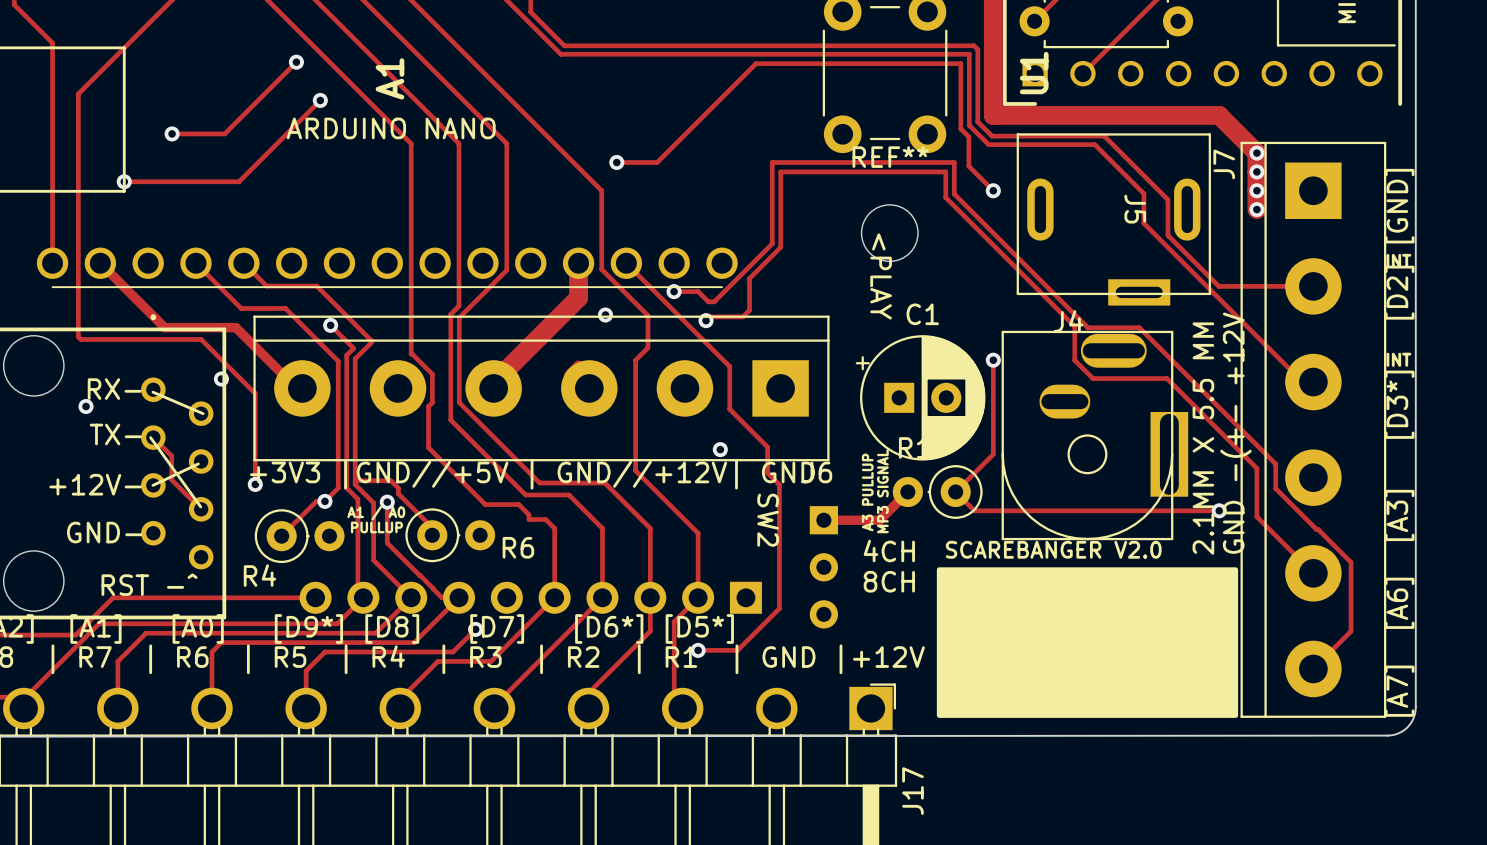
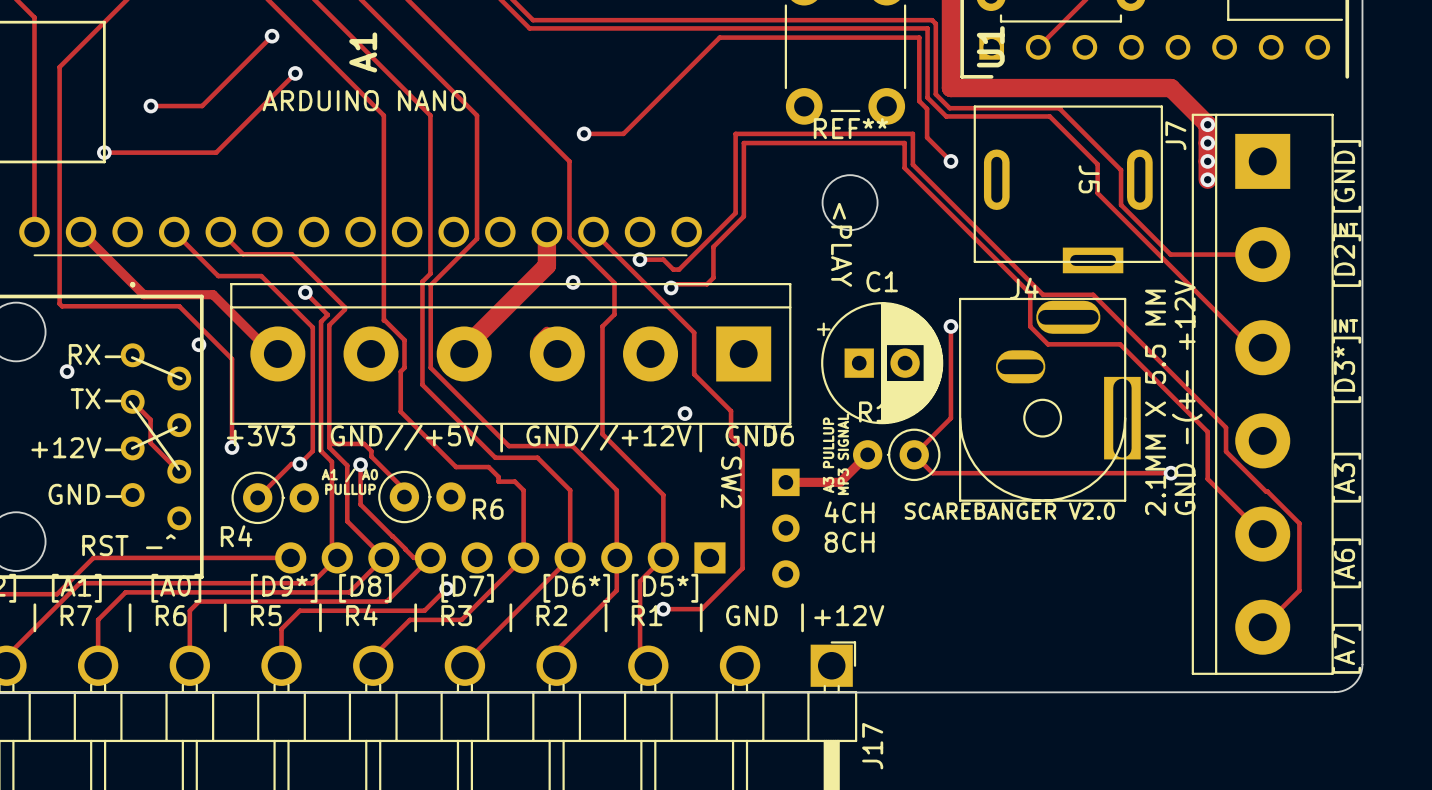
drawing: [936, 567, 1239, 718] -> none

